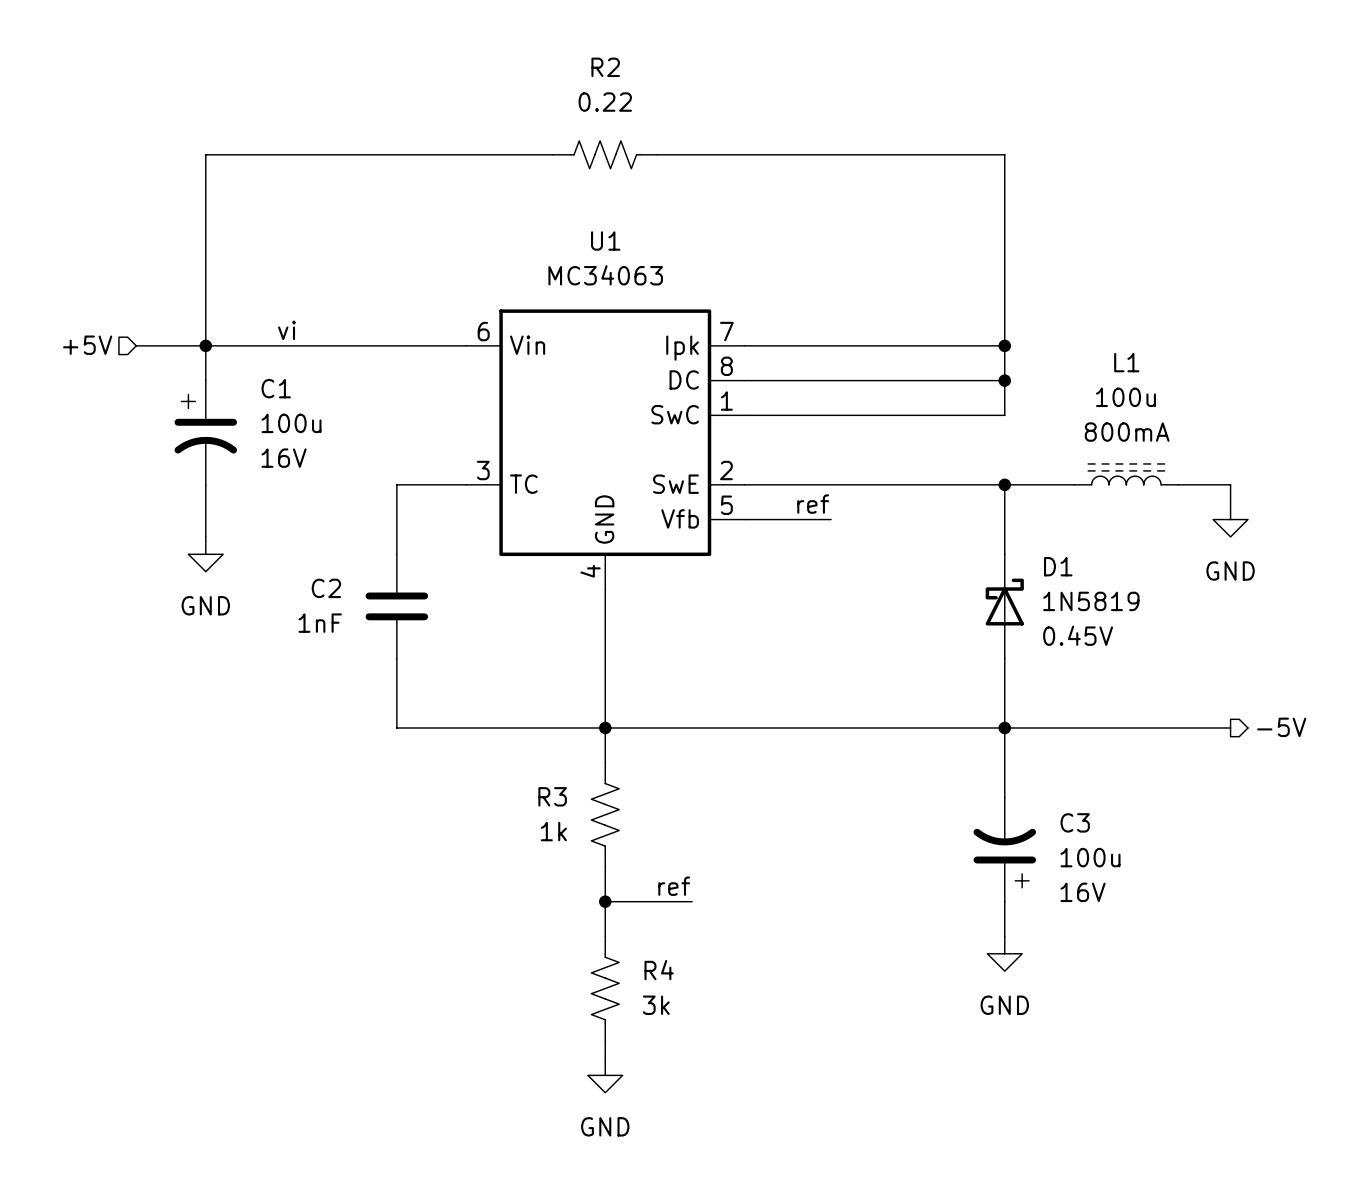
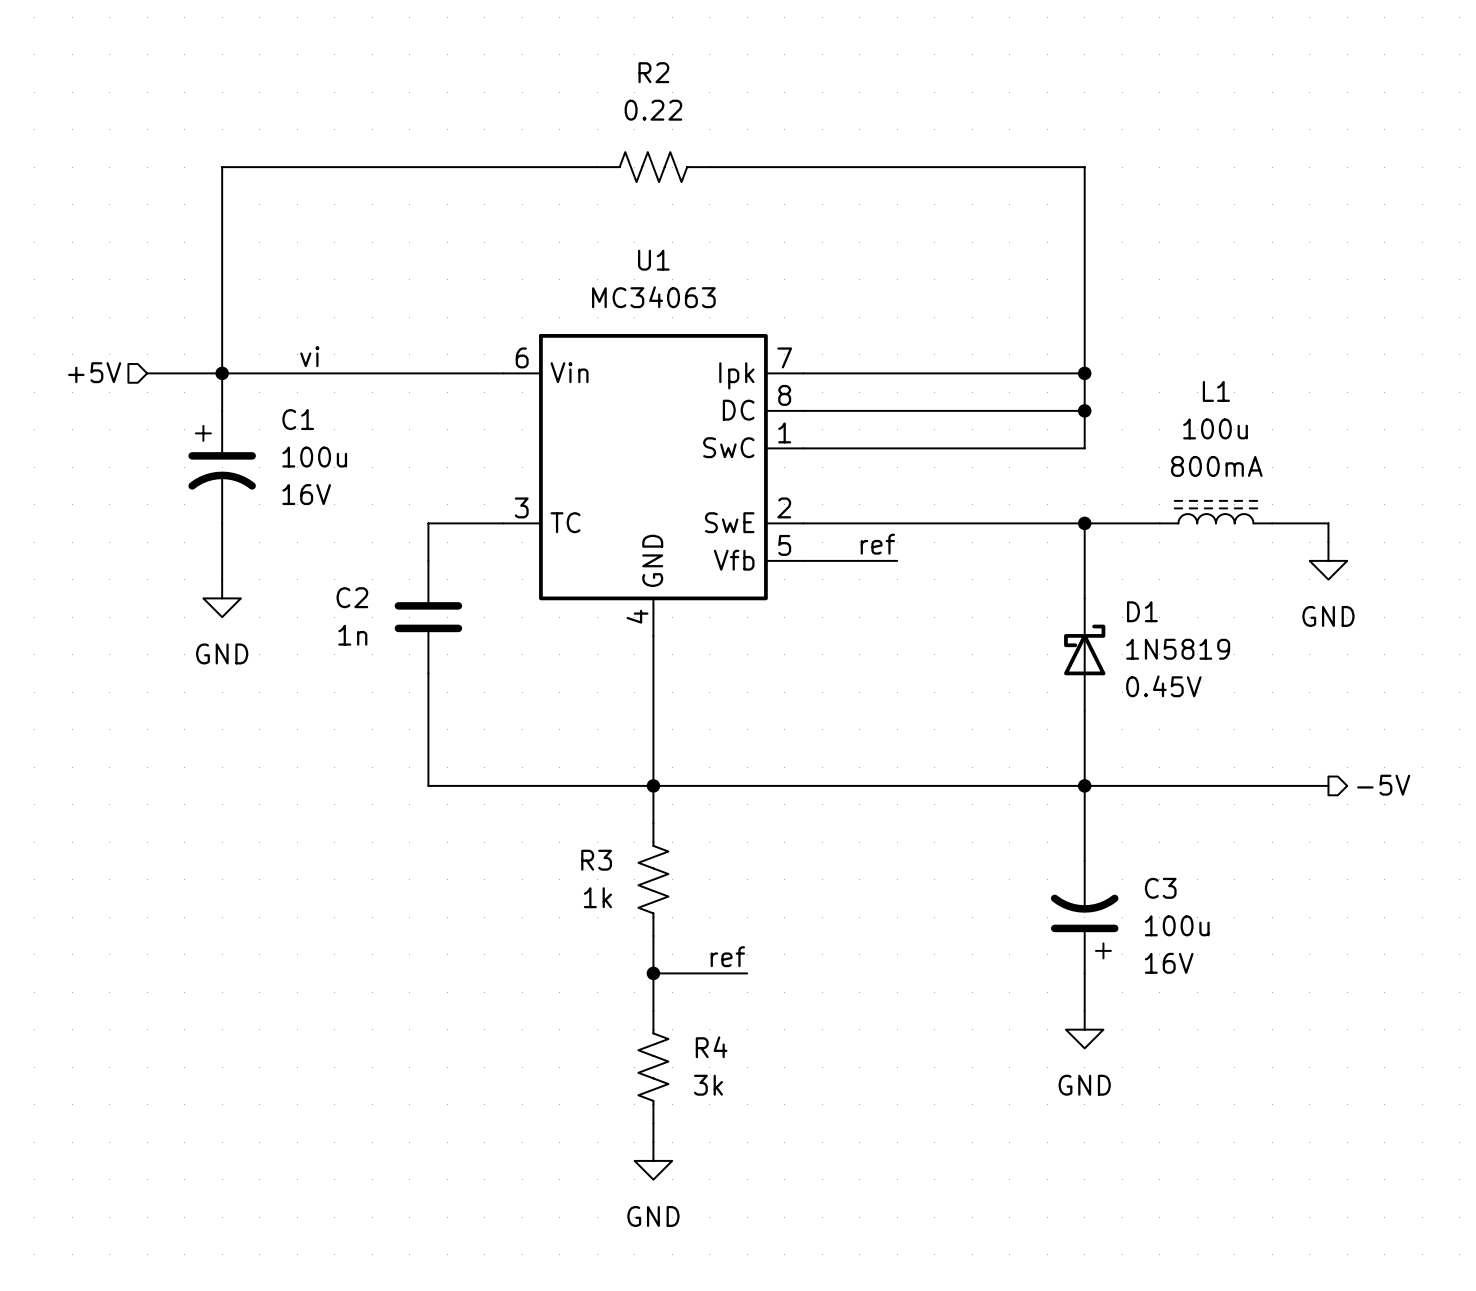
C2 position: (396, 606) -> (428, 617)
C2 value: 1nF (320, 623) -> 1n (352, 635)

